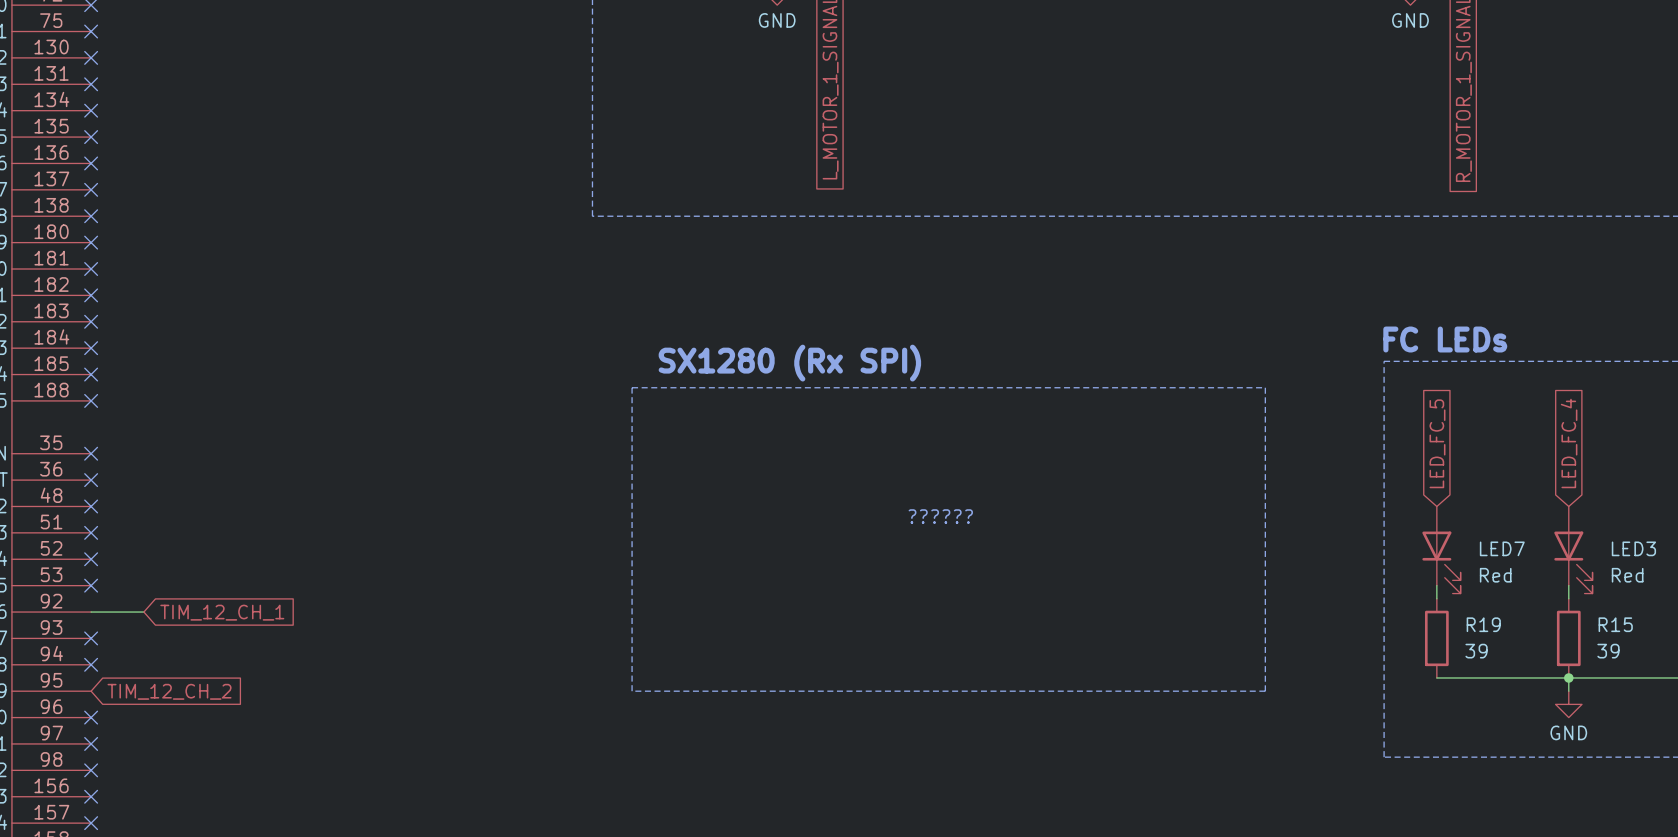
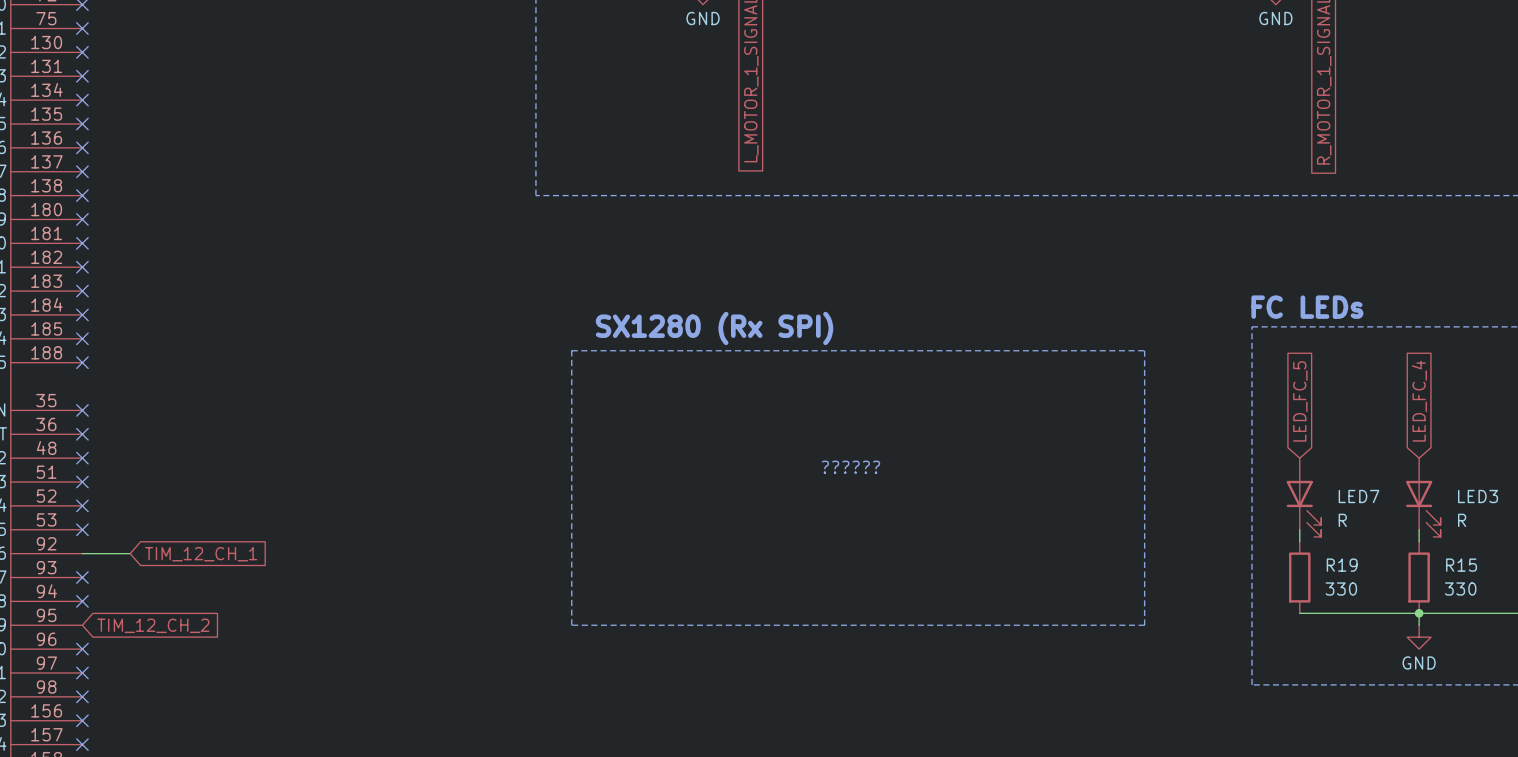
LED7 value: Red (1495, 575) -> R (1342, 520)
LED3 value: Red (1627, 575) -> R (1462, 520)
R19 value: 39 (1476, 651) -> 330 (1341, 588)
R15 value: 39 (1608, 651) -> 330 (1460, 588)

